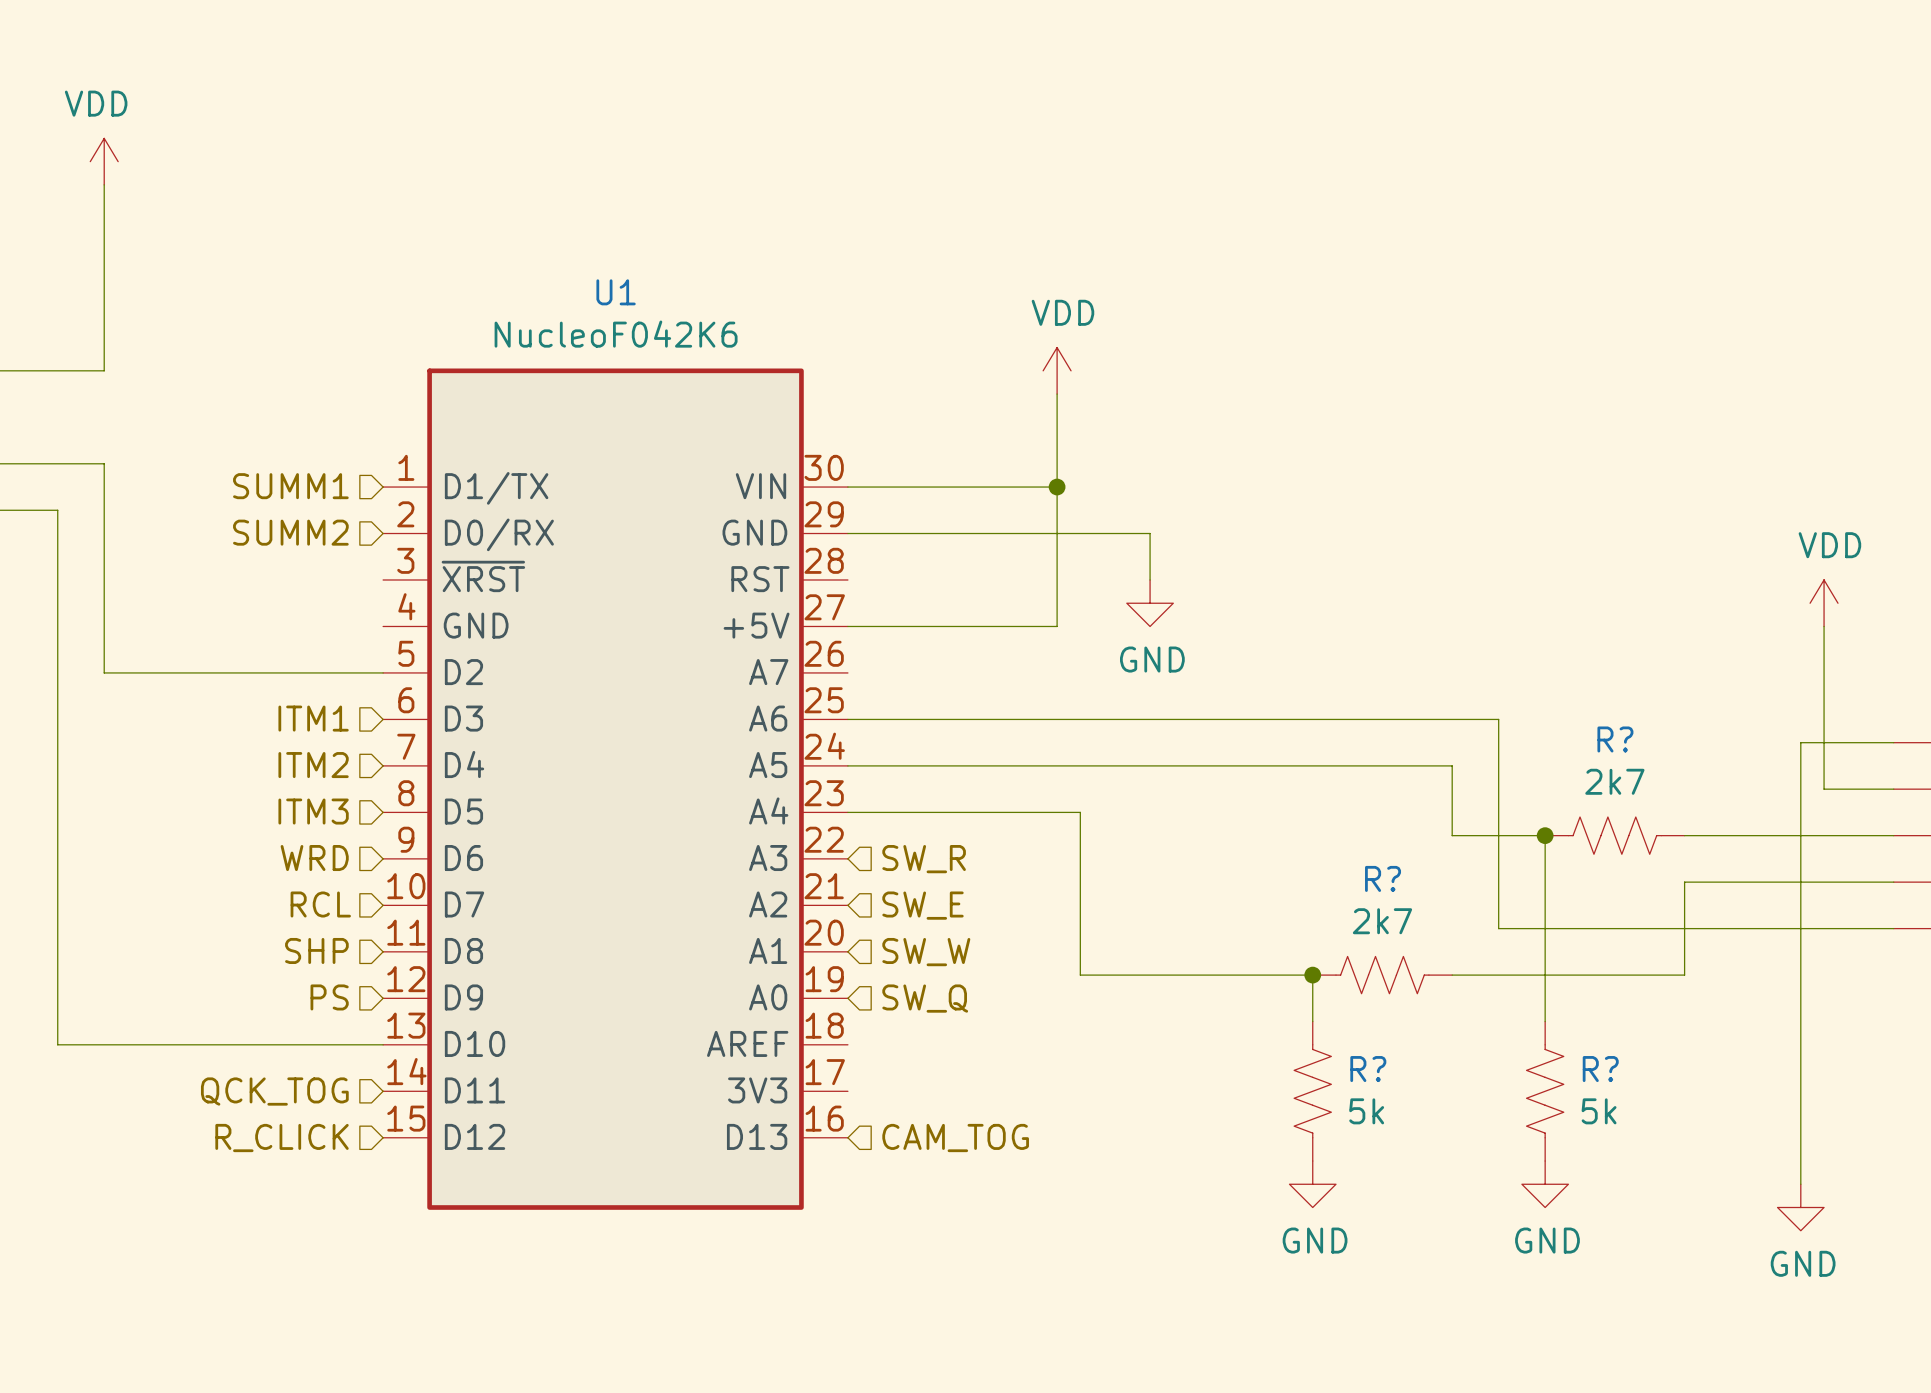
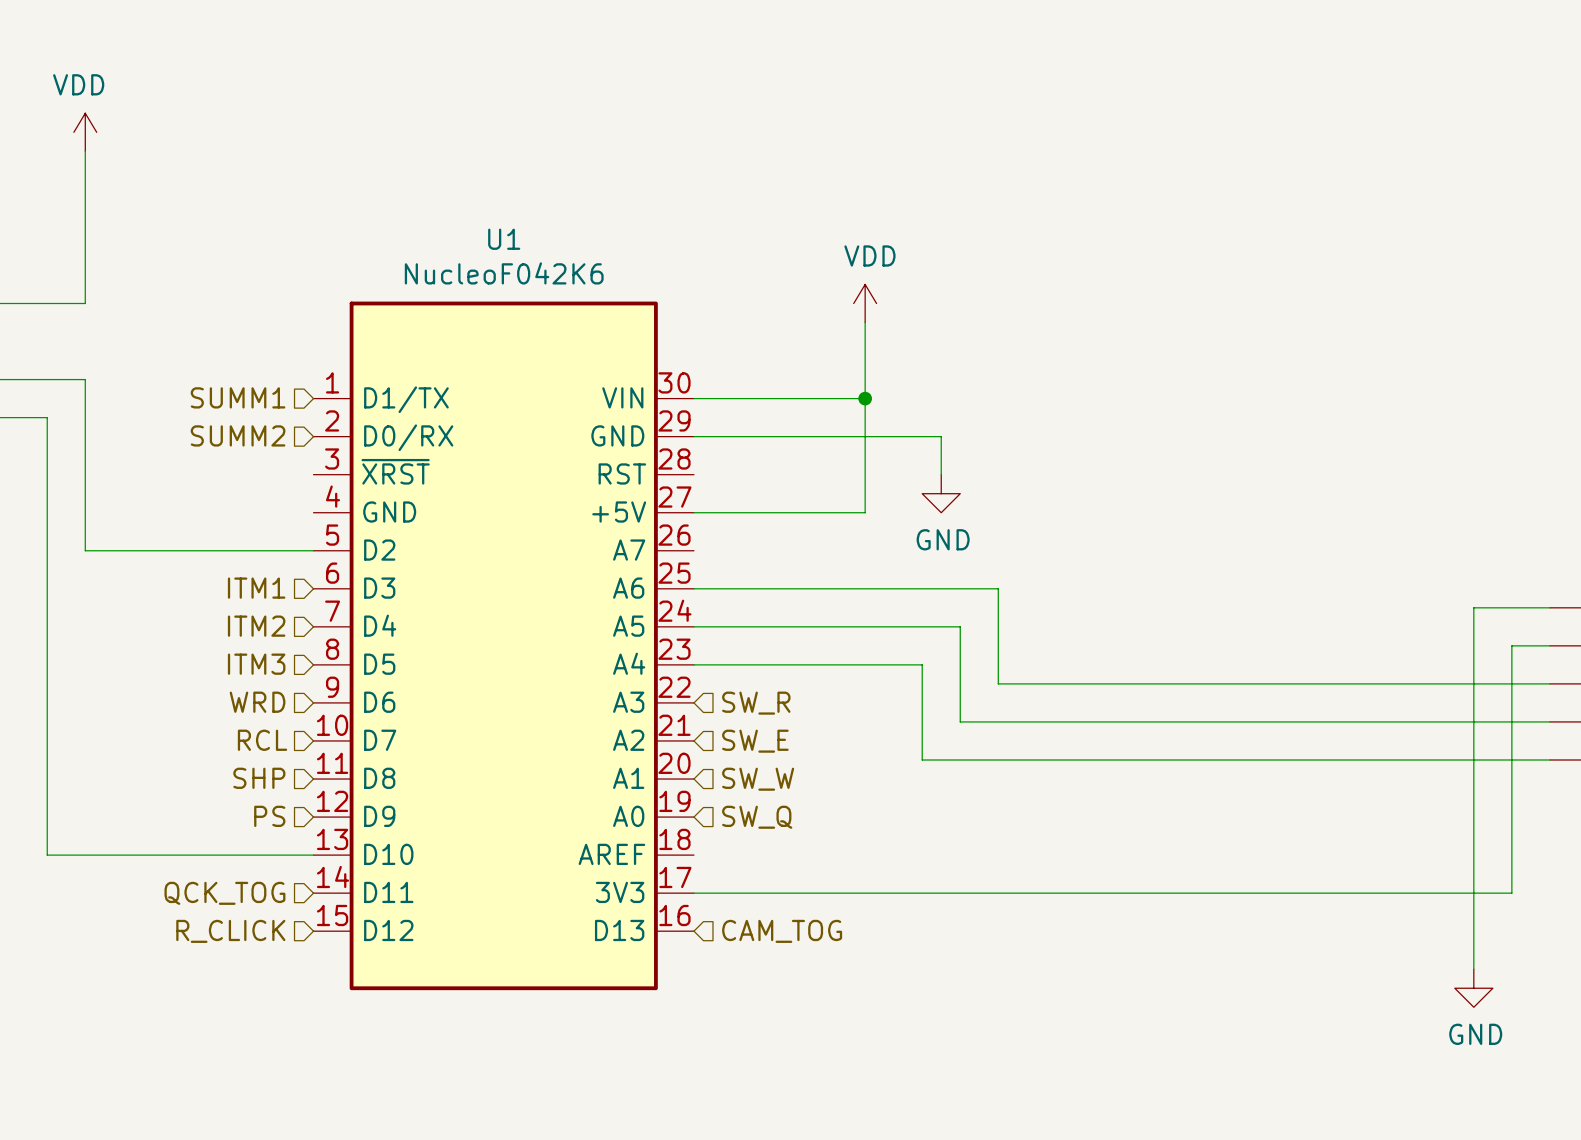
power symbol: VDD (1824, 603) -> none
wire: (1824, 626) (1824, 789) (1847, 789) -> (693, 893) (1511, 893) (1511, 645)
wire: (1219, 719) (1498, 719) (1498, 928) -> (884, 664) (922, 664) (922, 759) (1226, 759)
wire: (1173, 765) (1452, 765) (1452, 835) -> (998, 588) (998, 683) (1188, 683)
wire: (1080, 812) (1080, 975) (1312, 975) (1312, 1021) -> none
wire: (1545, 835) (1545, 1021) -> (1264, 683) (1378, 683)
junction: (1545, 835) -> none
R?: 2k7 (1614, 835) -> none
wire: (1684, 882) (1684, 975) (1452, 975) -> (1378, 721) (960, 721) (960, 626)
junction: (1312, 975) -> none
R?: 2k7 (1382, 975) -> none
R?: 5k (1312, 1091) -> none
R?: 5k (1545, 1091) -> none
power symbol: GND (1312, 1184) -> none
power symbol: GND (1545, 1184) -> none

